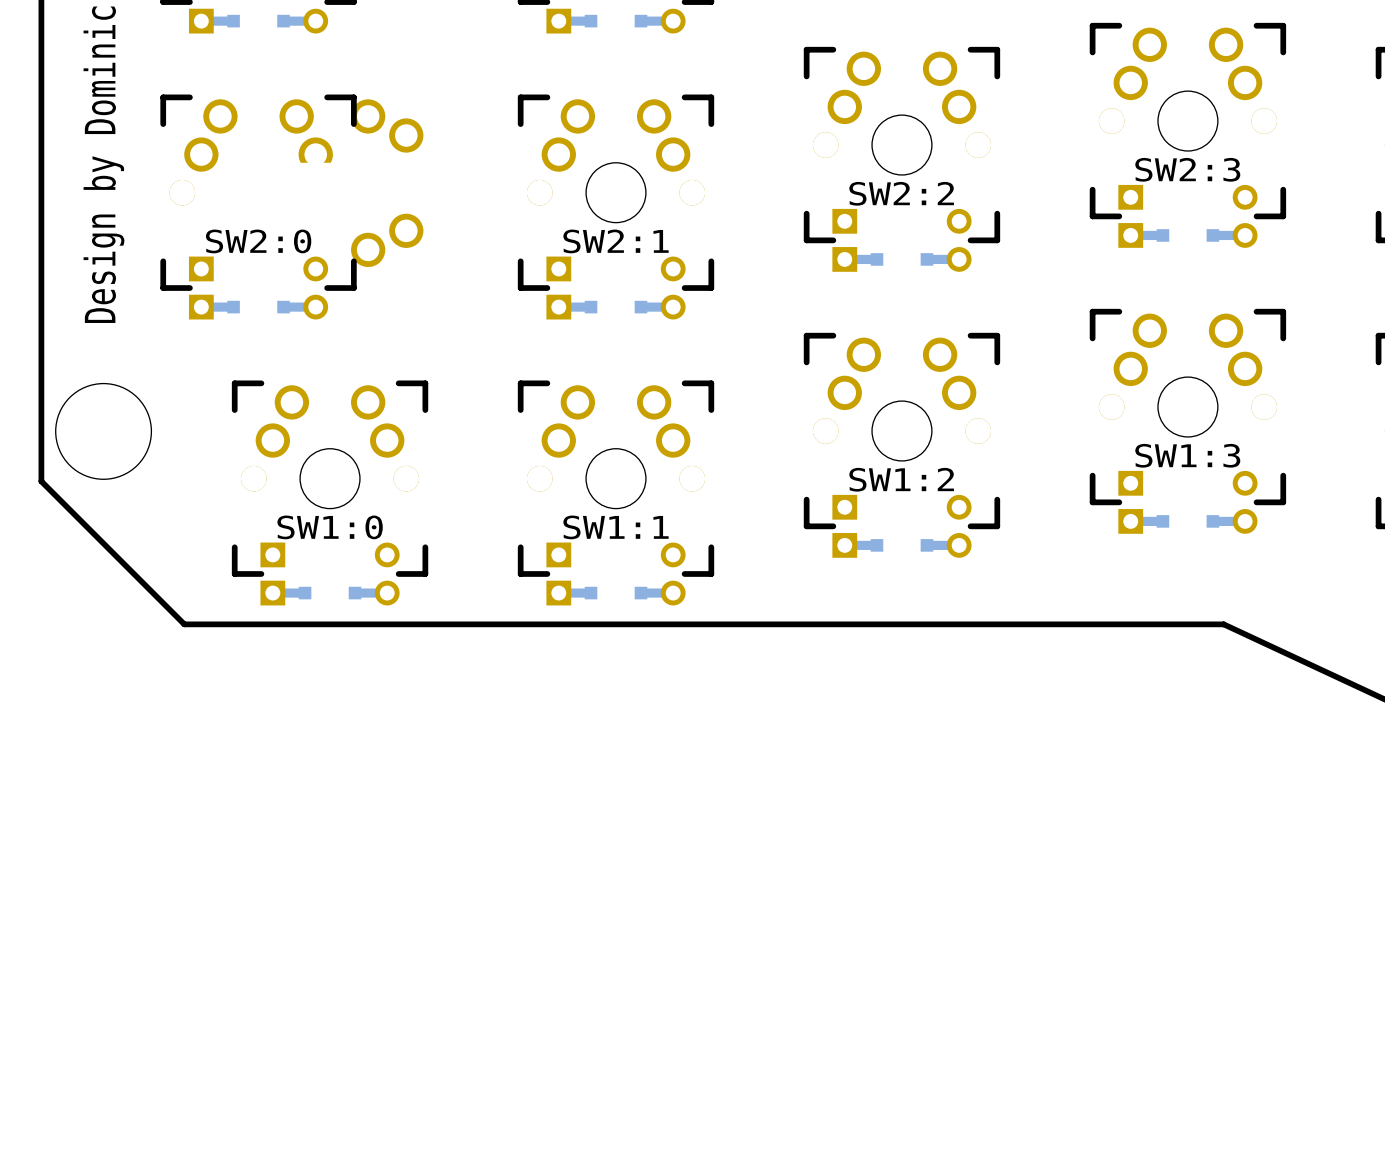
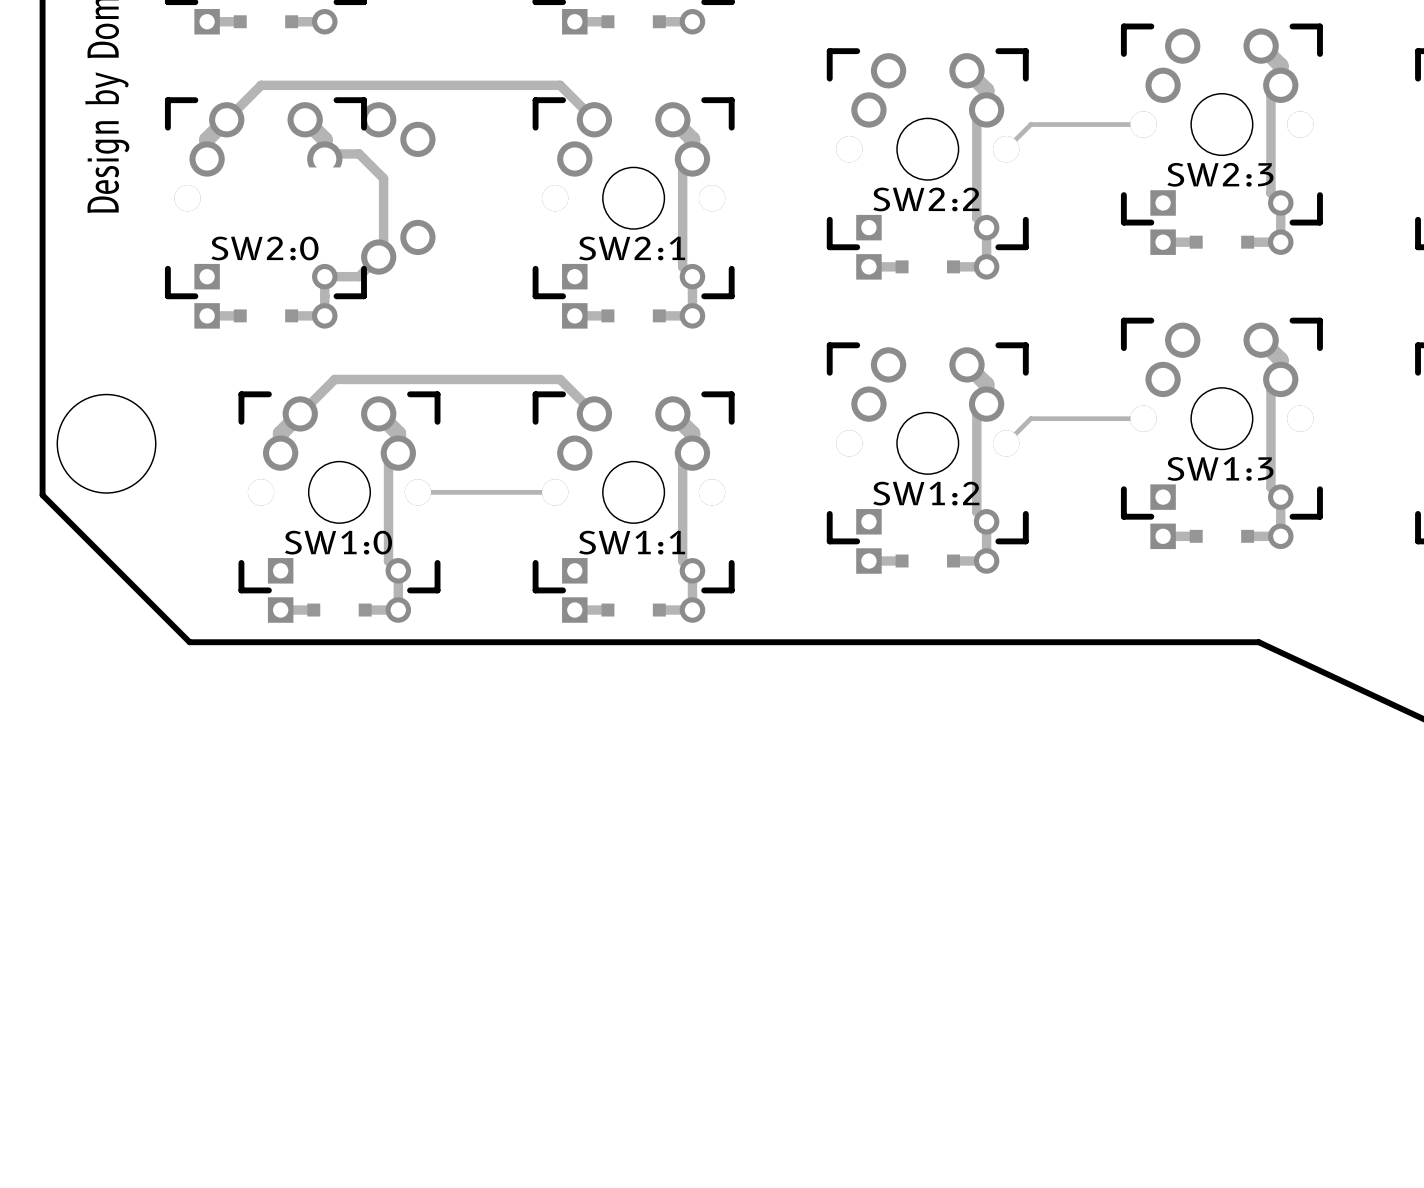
track: none -> (1261, 46) (1280, 65) (1280, 85) (1270, 95) (1270, 193) (1280, 202) (1280, 242)
track: none -> (966, 70) (986, 90) (986, 109) (976, 119) (976, 217) (986, 227) (986, 266)
track: none -> (594, 119) (560, 85) (261, 85) (207, 139) (207, 159) (207, 149)
track: none -> (672, 119) (692, 139) (692, 159) (682, 168) (682, 266) (692, 276) (692, 315)
track: none -> (1143, 124) (1030, 124) (1006, 149)
track: none -> (314, 129) (305, 119) (324, 139) (324, 159) (329, 153) (359, 153) (383, 178) (383, 252) (359, 276) (324, 276) (324, 315) (324, 296)
track: none -> (1261, 340) (1280, 359) (1280, 379) (1270, 389) (1270, 487) (1280, 497) (1280, 536)
track: none -> (966, 364) (986, 384) (986, 404) (976, 413) (976, 511) (986, 521) (986, 561)
track: none -> (378, 413) (398, 433) (398, 453) (388, 462) (388, 561) (398, 570) (398, 610)
track: none -> (594, 413) (560, 379) (334, 379) (280, 433) (280, 453)
track: none -> (672, 413) (692, 433) (692, 453) (682, 462) (682, 561) (692, 570) (692, 610)
track: none -> (1143, 418) (1030, 418) (1006, 443)
track: none -> (555, 492) (417, 492)

